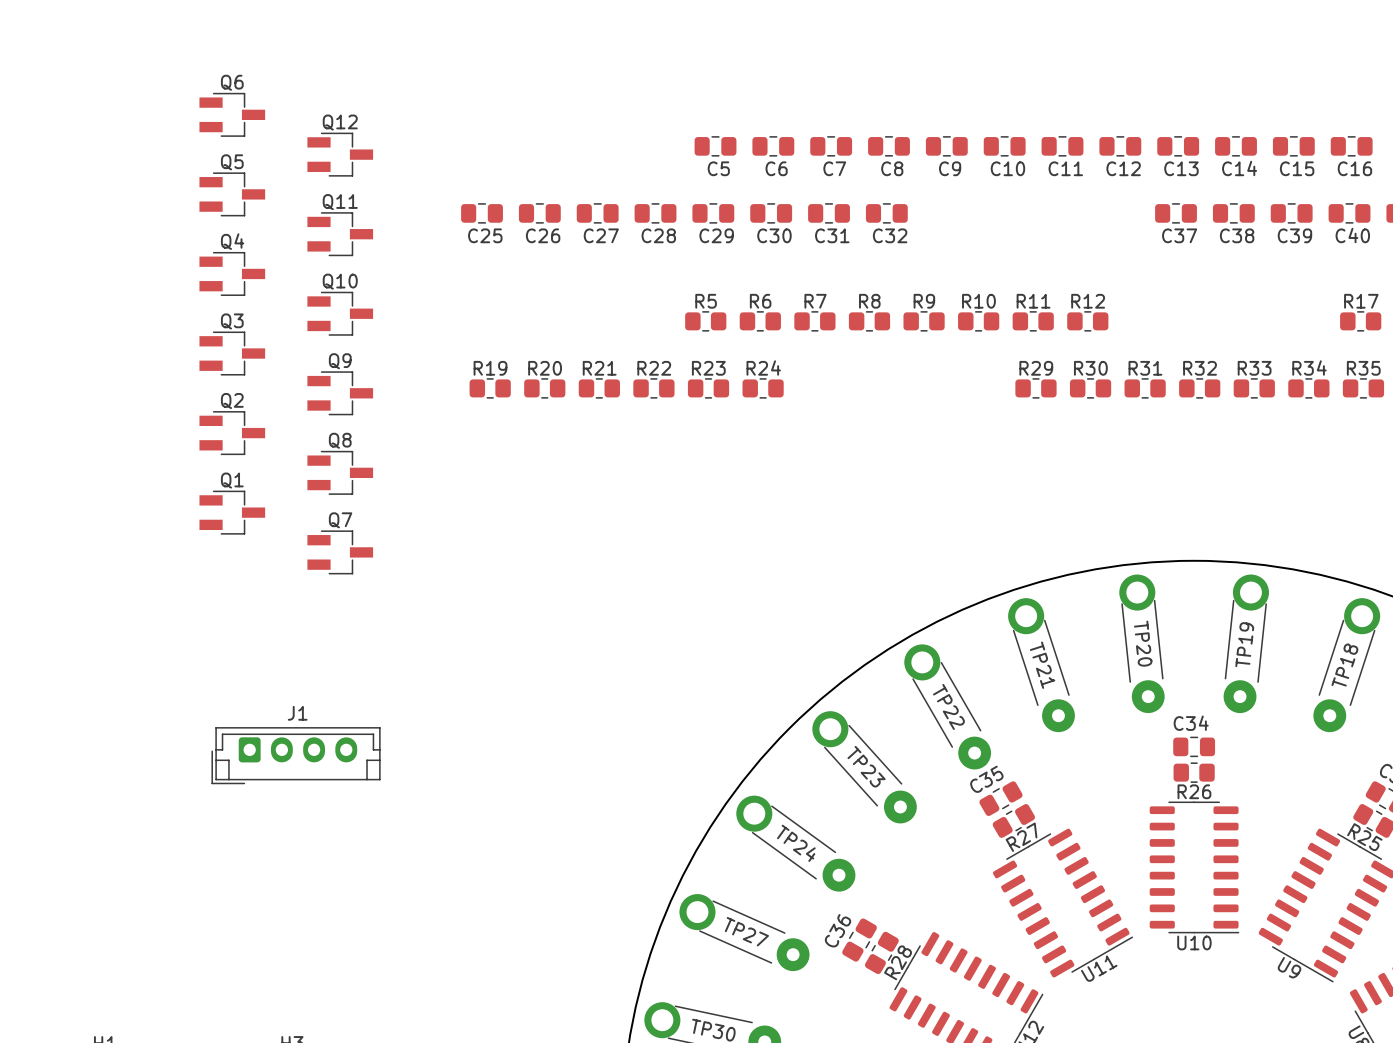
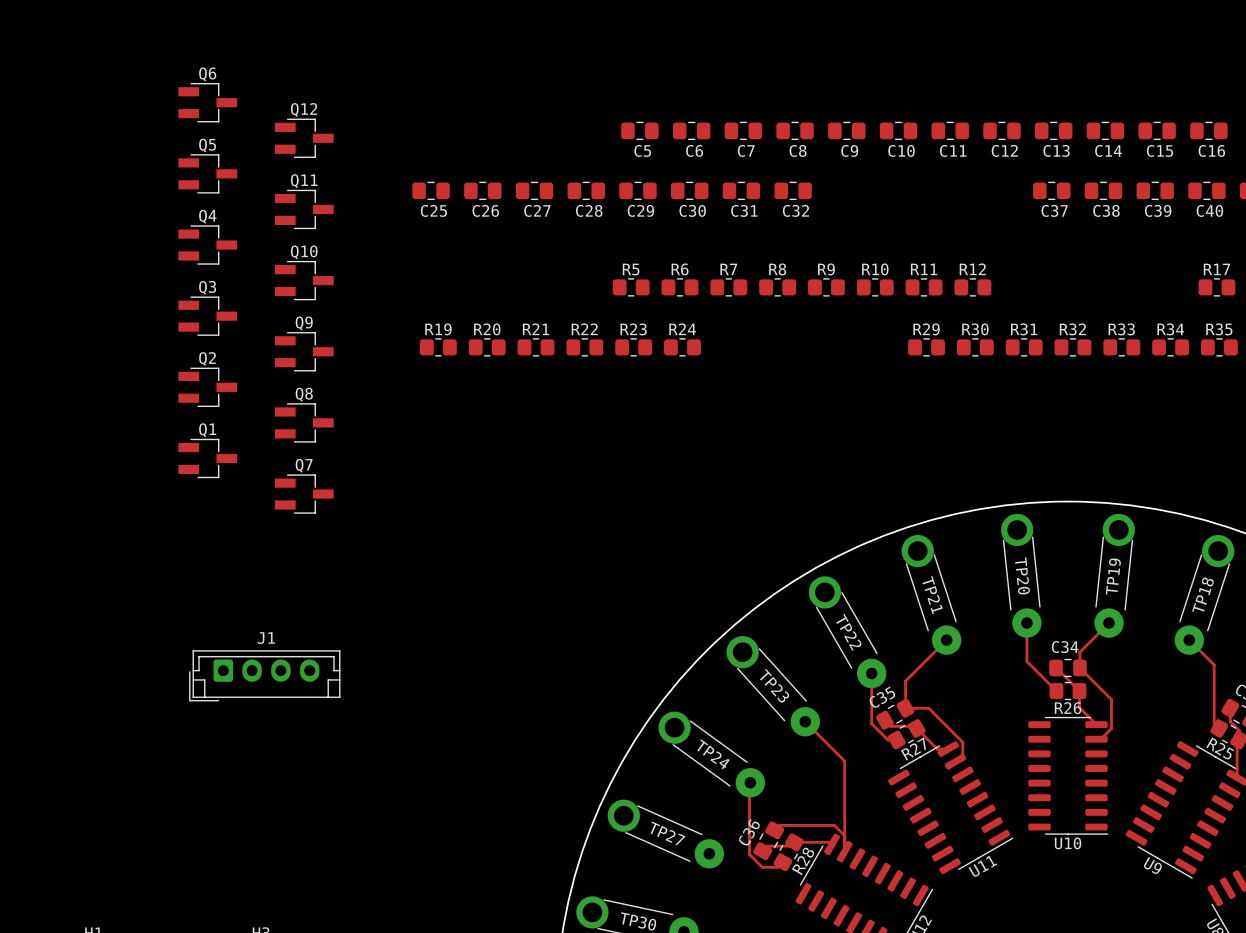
track: none -> (1026, 623) (1026, 661) (1056, 691)
track: none -> (1109, 623) (1079, 652) (1079, 667) (1111, 699) (1111, 728) (1100, 739) (1096, 739)
track: none -> (946, 640) (905, 681) (905, 708) (928, 708) (962, 742) (962, 754) (955, 761)
track: none -> (1189, 640) (1214, 665) (1214, 723) (1219, 728)
track: none -> (1056, 667) (1079, 691) (1079, 707) (1096, 724)
track: none -> (871, 673) (871, 723) (887, 739) (896, 739)
track: none -> (1230, 708) (1230, 721) (1239, 730) (1239, 739) (1237, 742) (1237, 777)
track: none -> (884, 720) (890, 726) (914, 726) (937, 749) (948, 749)
track: none -> (805, 721) (844, 761) (844, 851)
track: none -> (750, 782) (749, 854) (762, 867) (777, 867) (782, 862)
track: none -> (774, 830) (779, 825) (834, 825) (844, 835)
track: none -> (832, 844) (829, 842) (794, 842) (790, 846) (767, 846) (762, 851)

